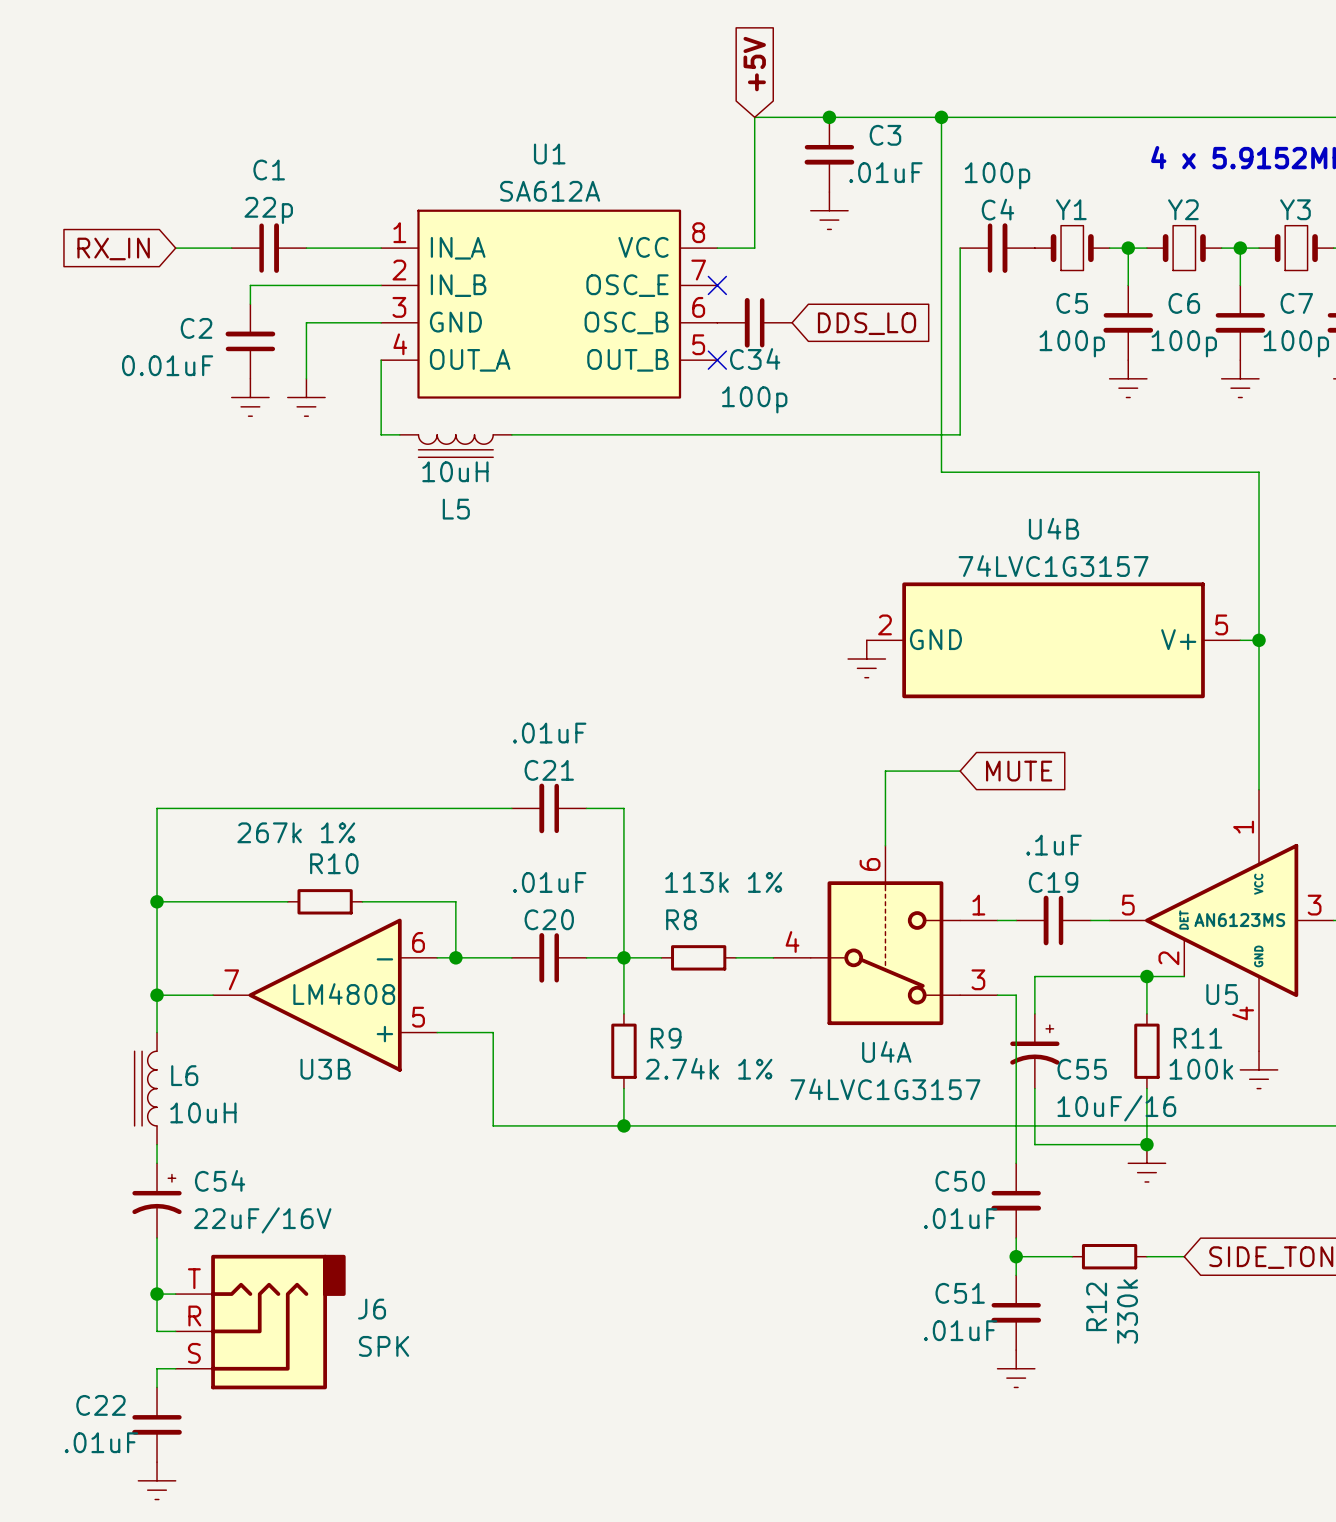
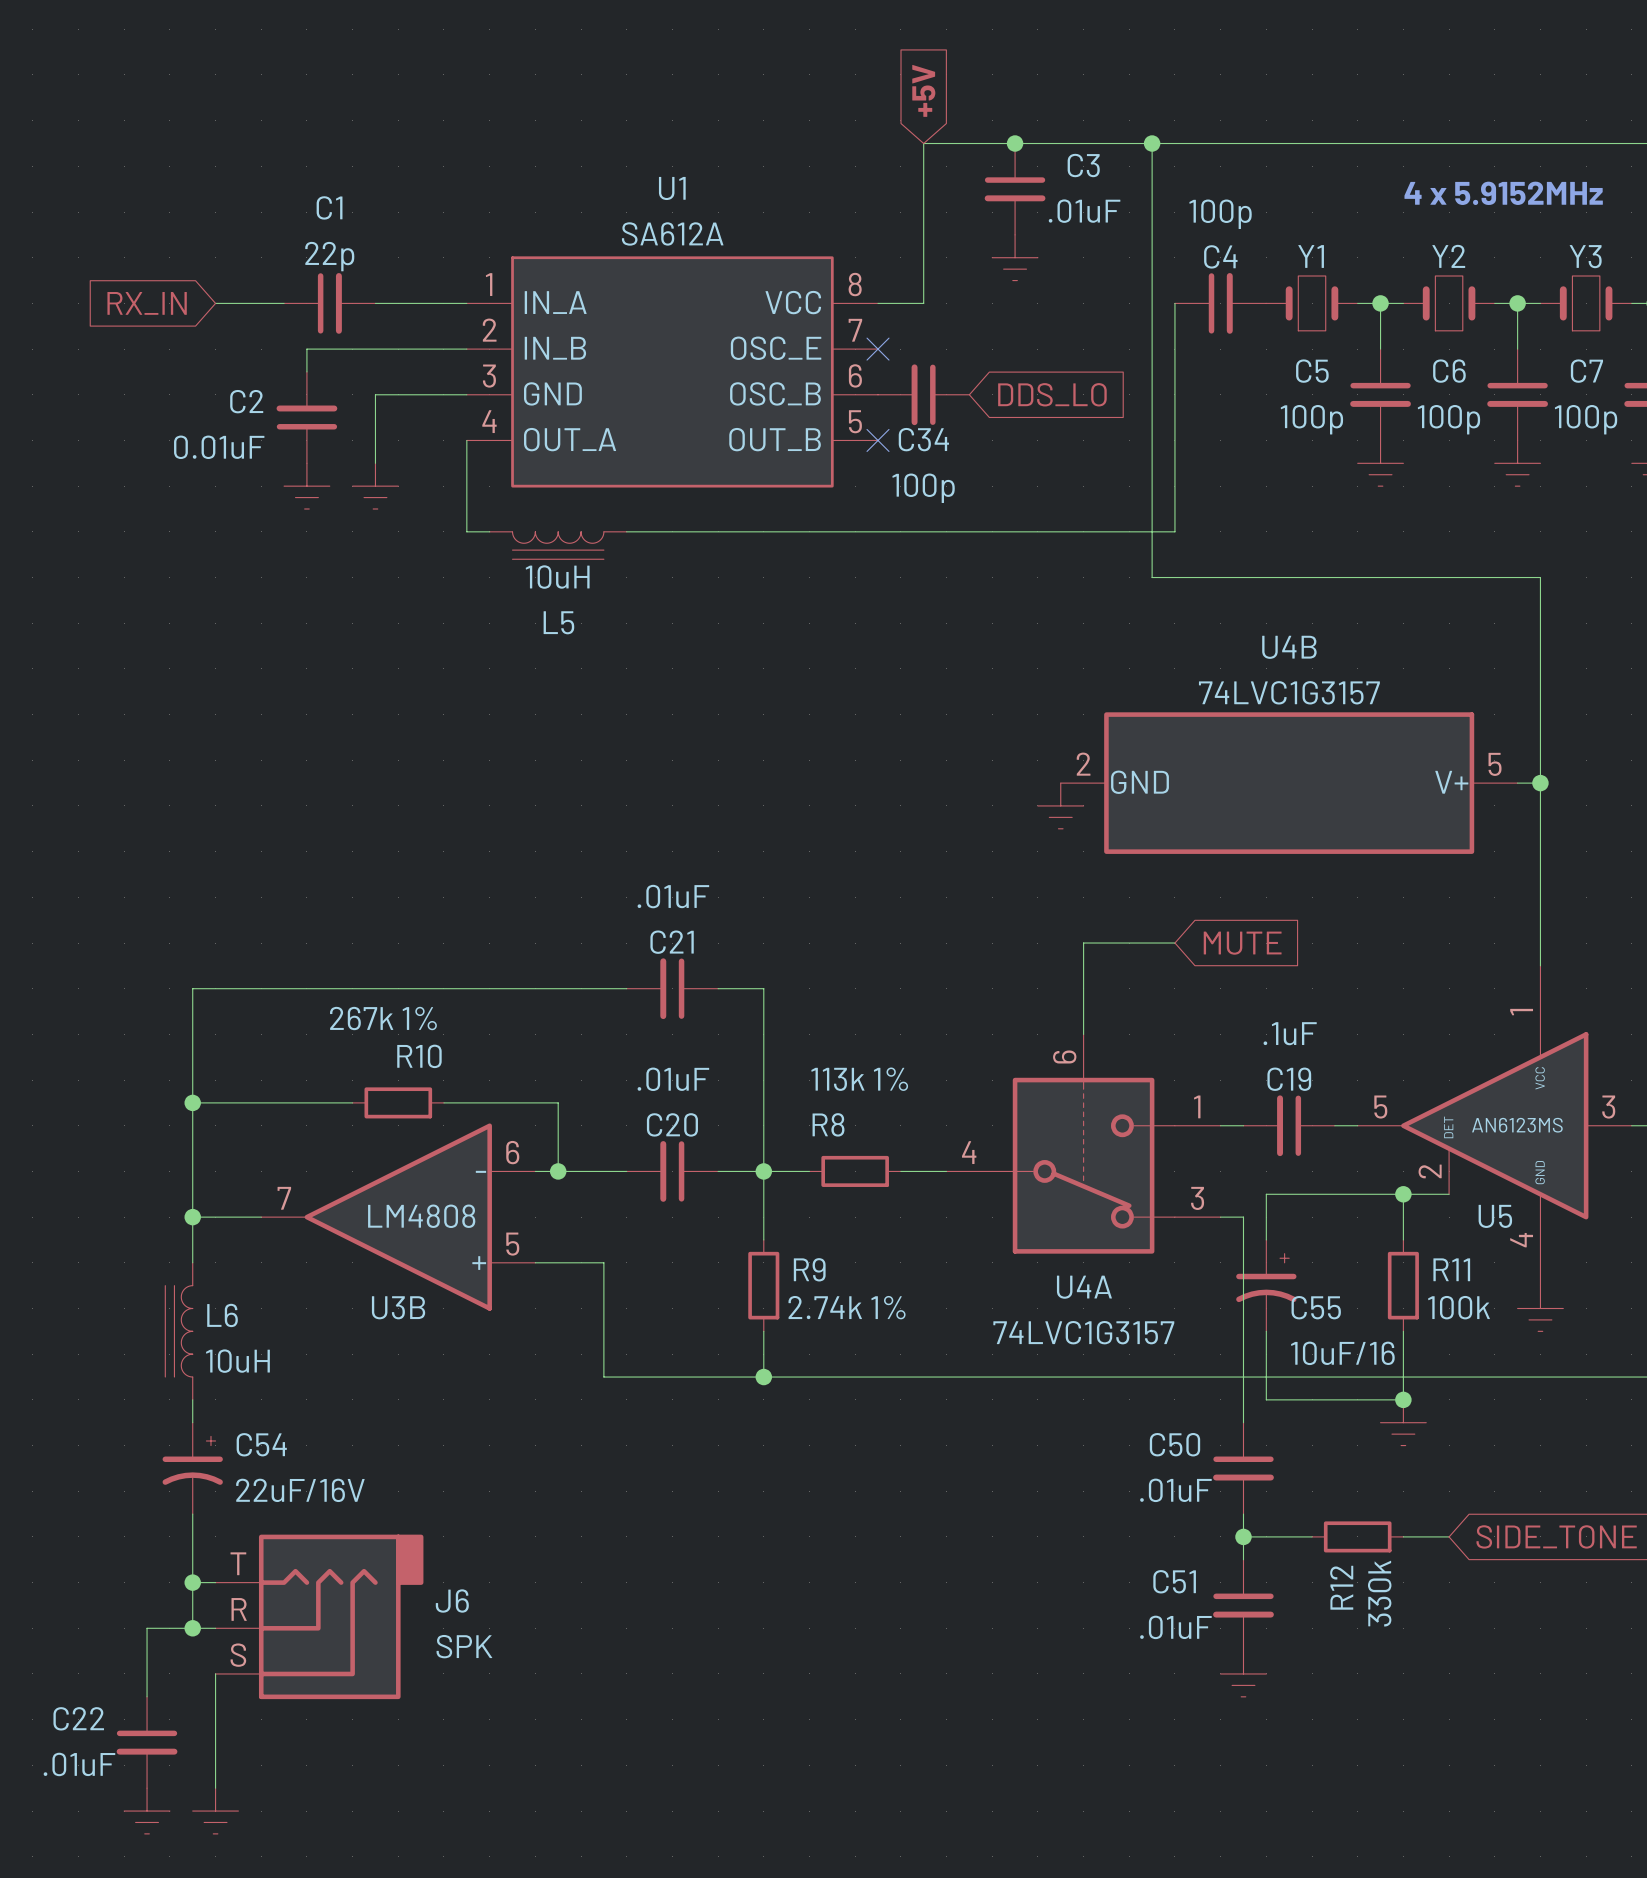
wire: none -> (192, 1628) (147, 1628) (147, 1696)
junction: none -> (192, 1628)
wire: (175, 1368) (157, 1368) (157, 1387) -> (215, 1673) (215, 1788)
C22 position: (157, 1424) -> (147, 1742)
power symbol: none -> (147, 1811)
power symbol: (157, 1480) -> none
power symbol: none -> (215, 1811)

